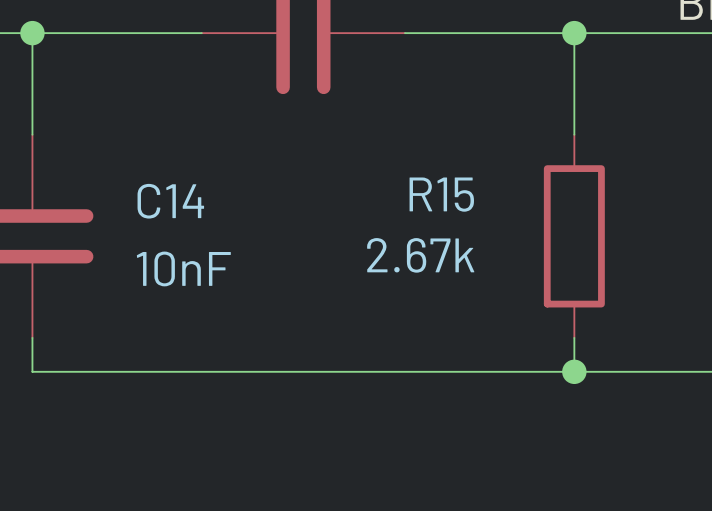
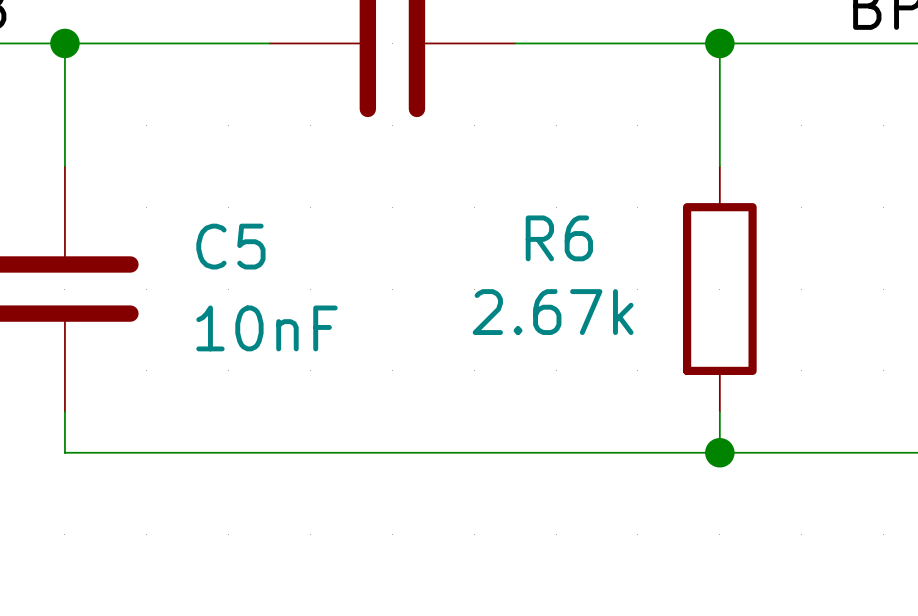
R15 name: R15 (441, 194) -> R6 (559, 238)
C14 name: C14 (170, 201) -> C5 (230, 246)

